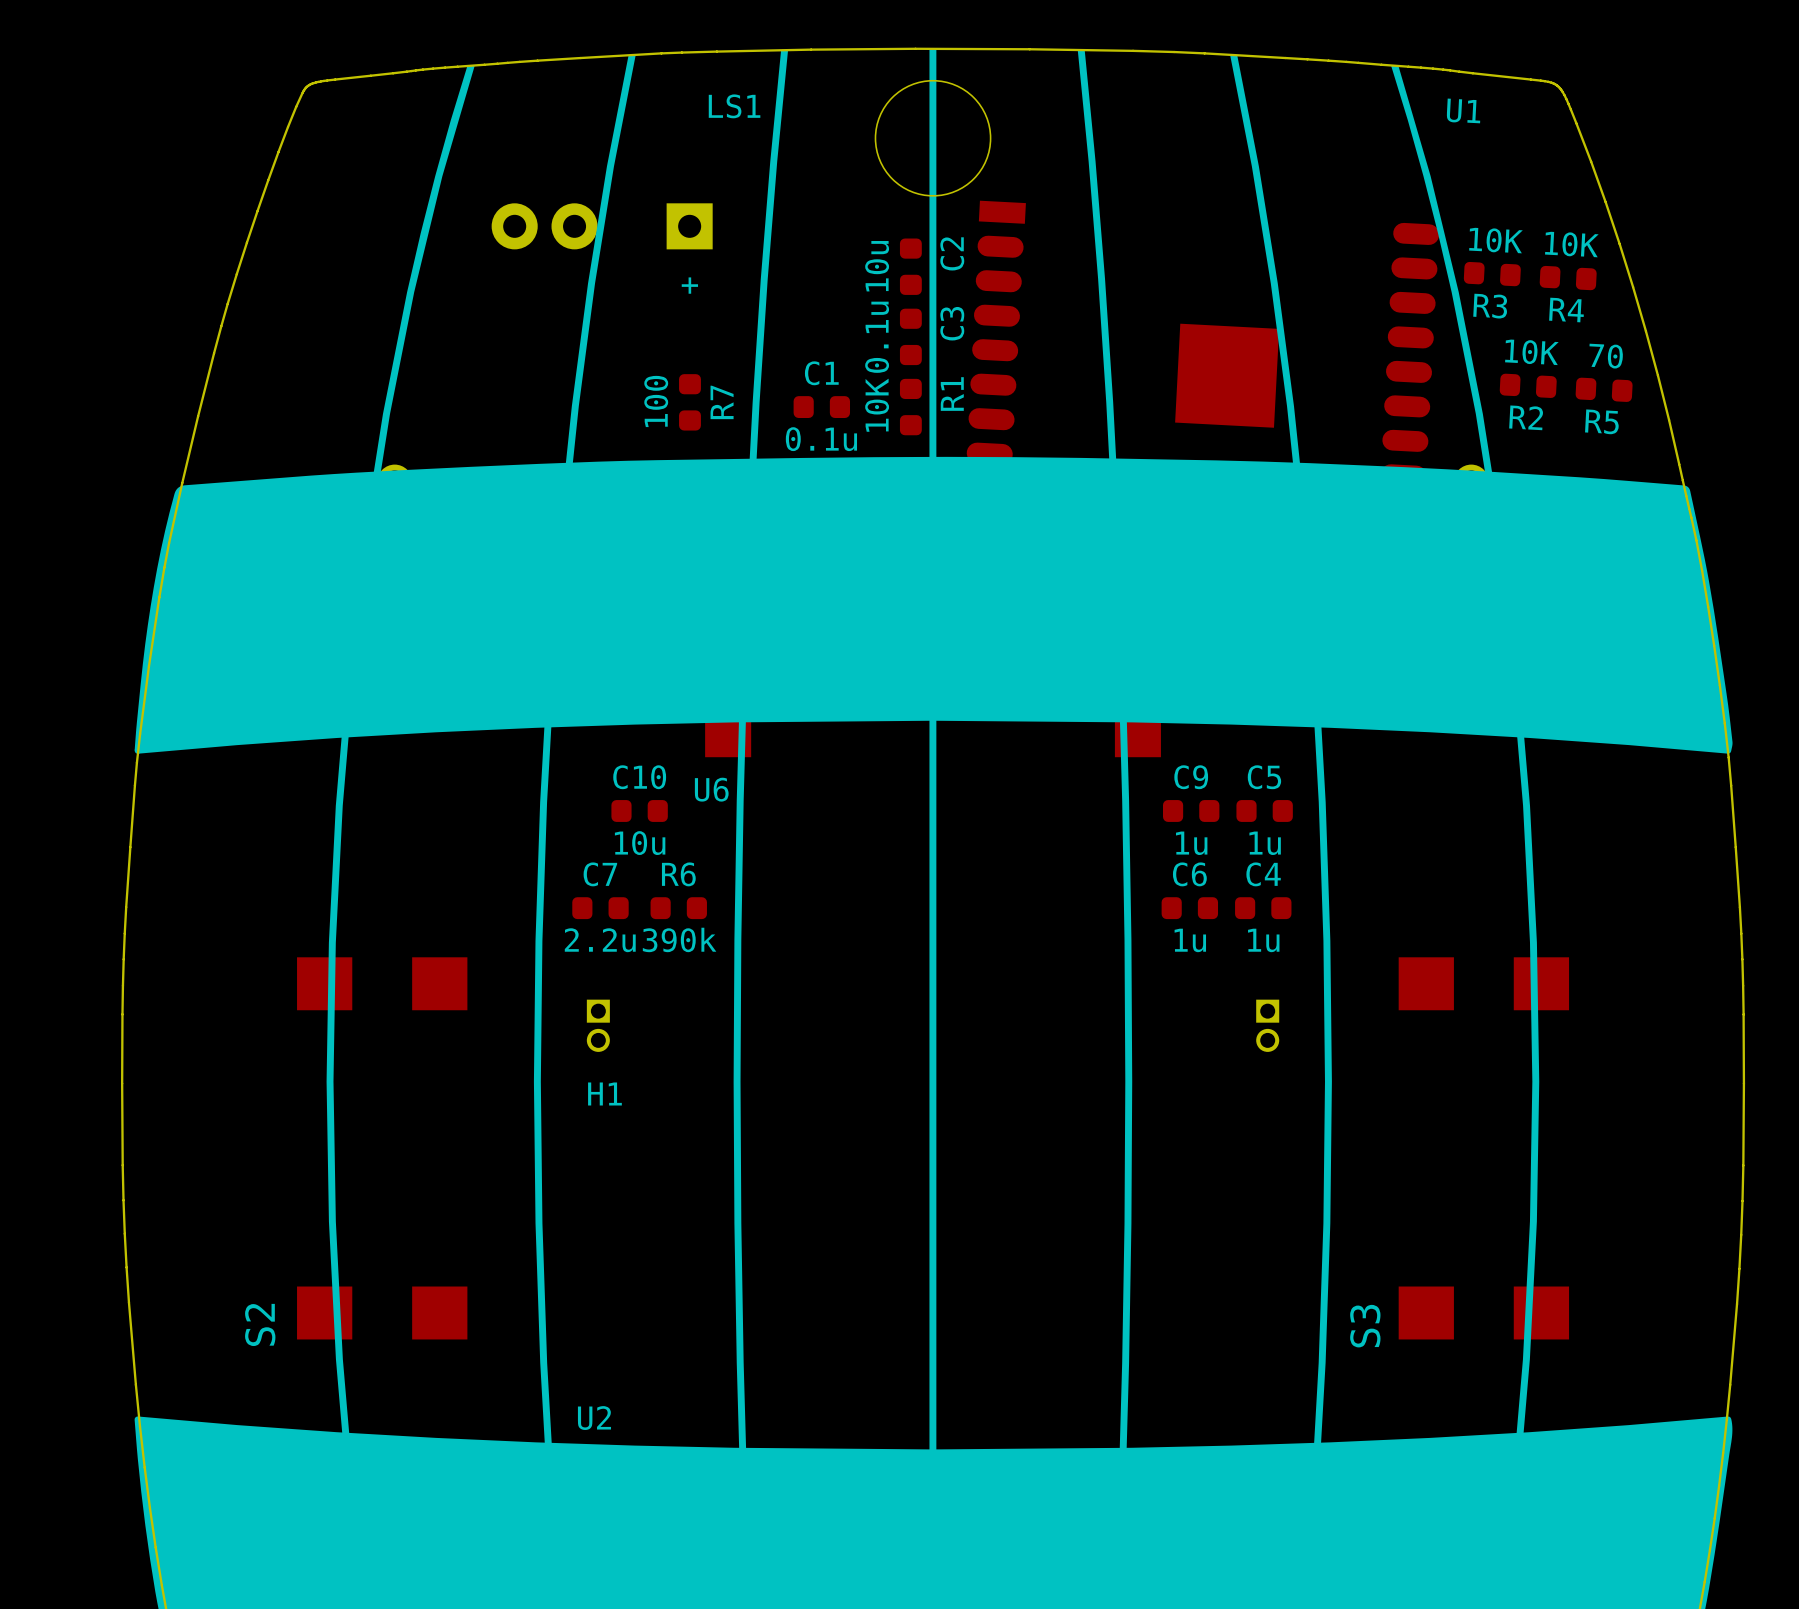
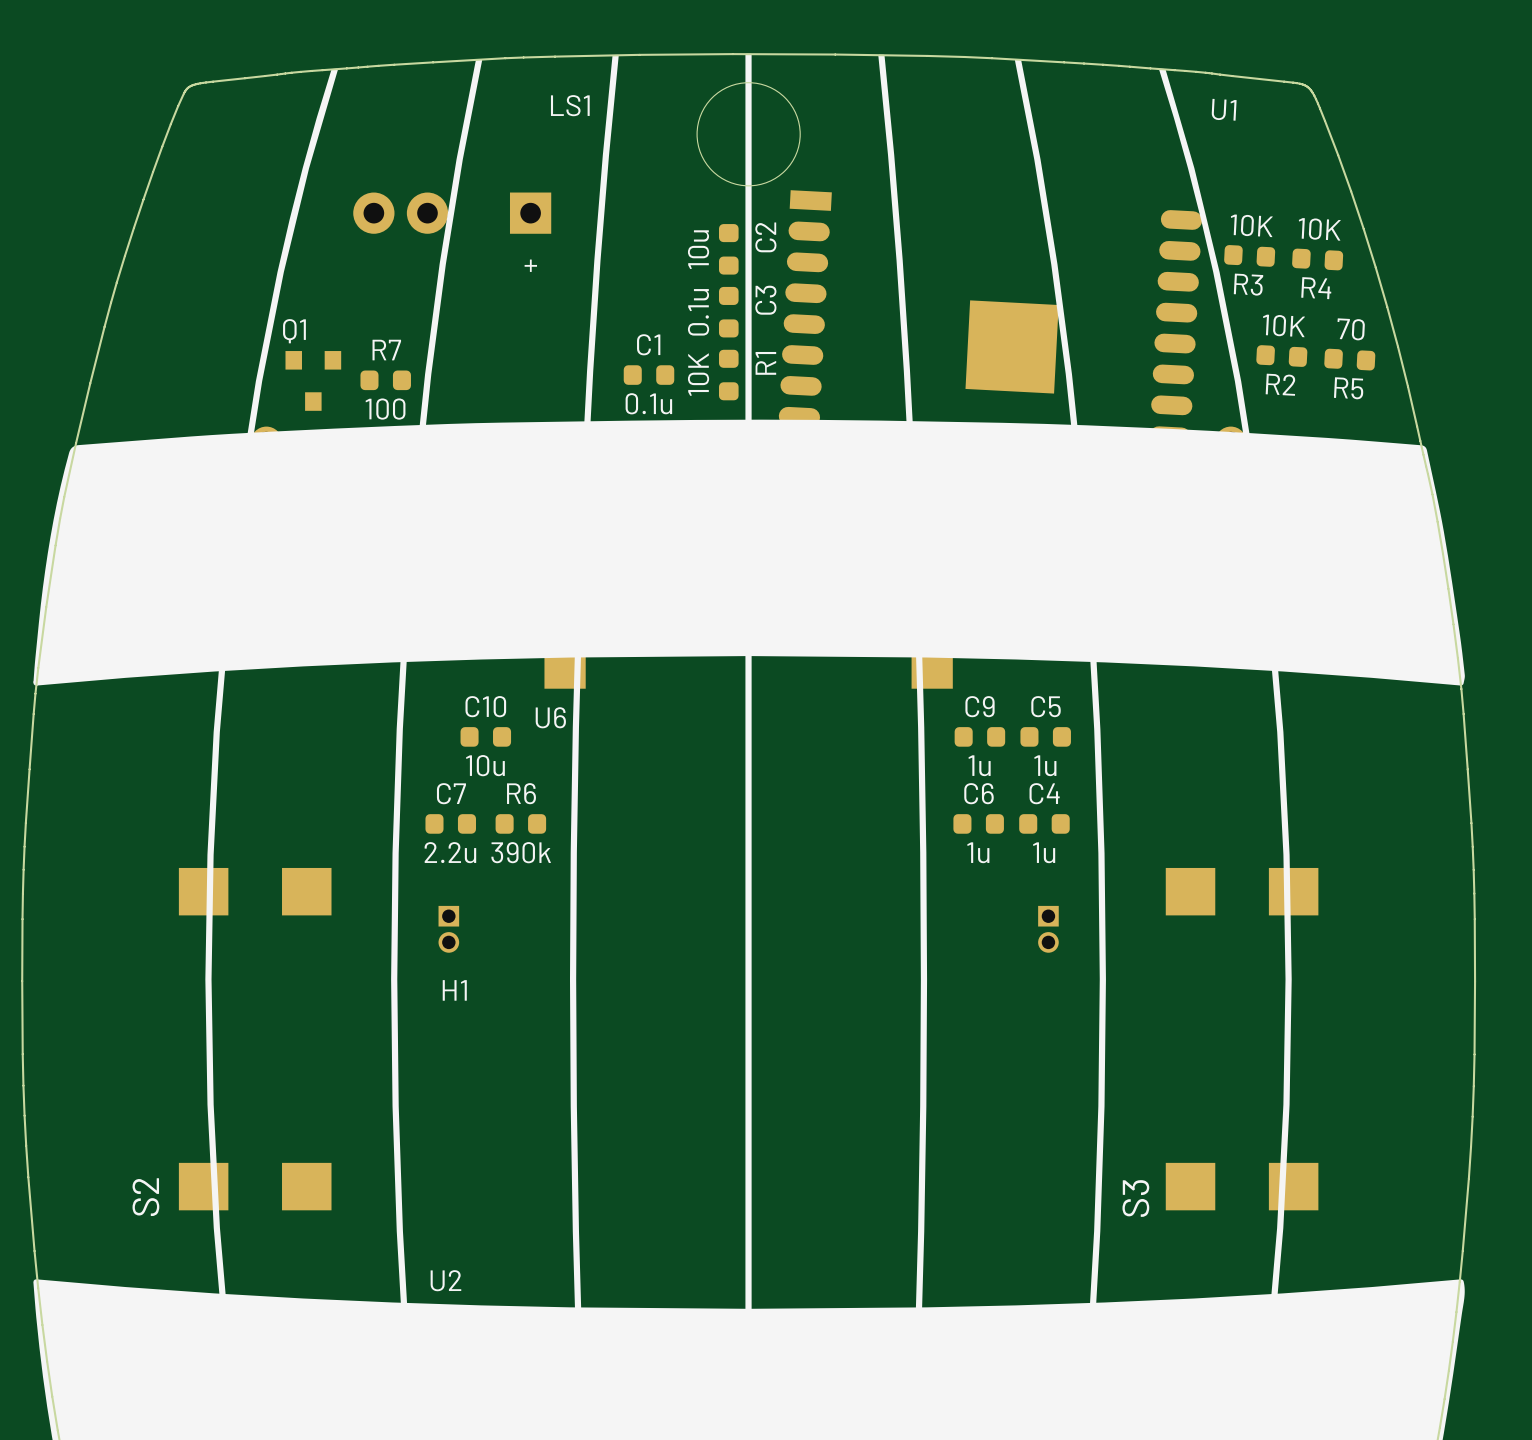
R7 value position: 100 (656, 401) -> 100 (385, 409)
R7 rotation: 0° (689, 402) -> 90° clockwise (385, 380)
R7 position: (689, 402) -> (385, 380)
R7 name position: R7 (722, 402) -> R7 (386, 350)
Q1: none -> (313, 380)

